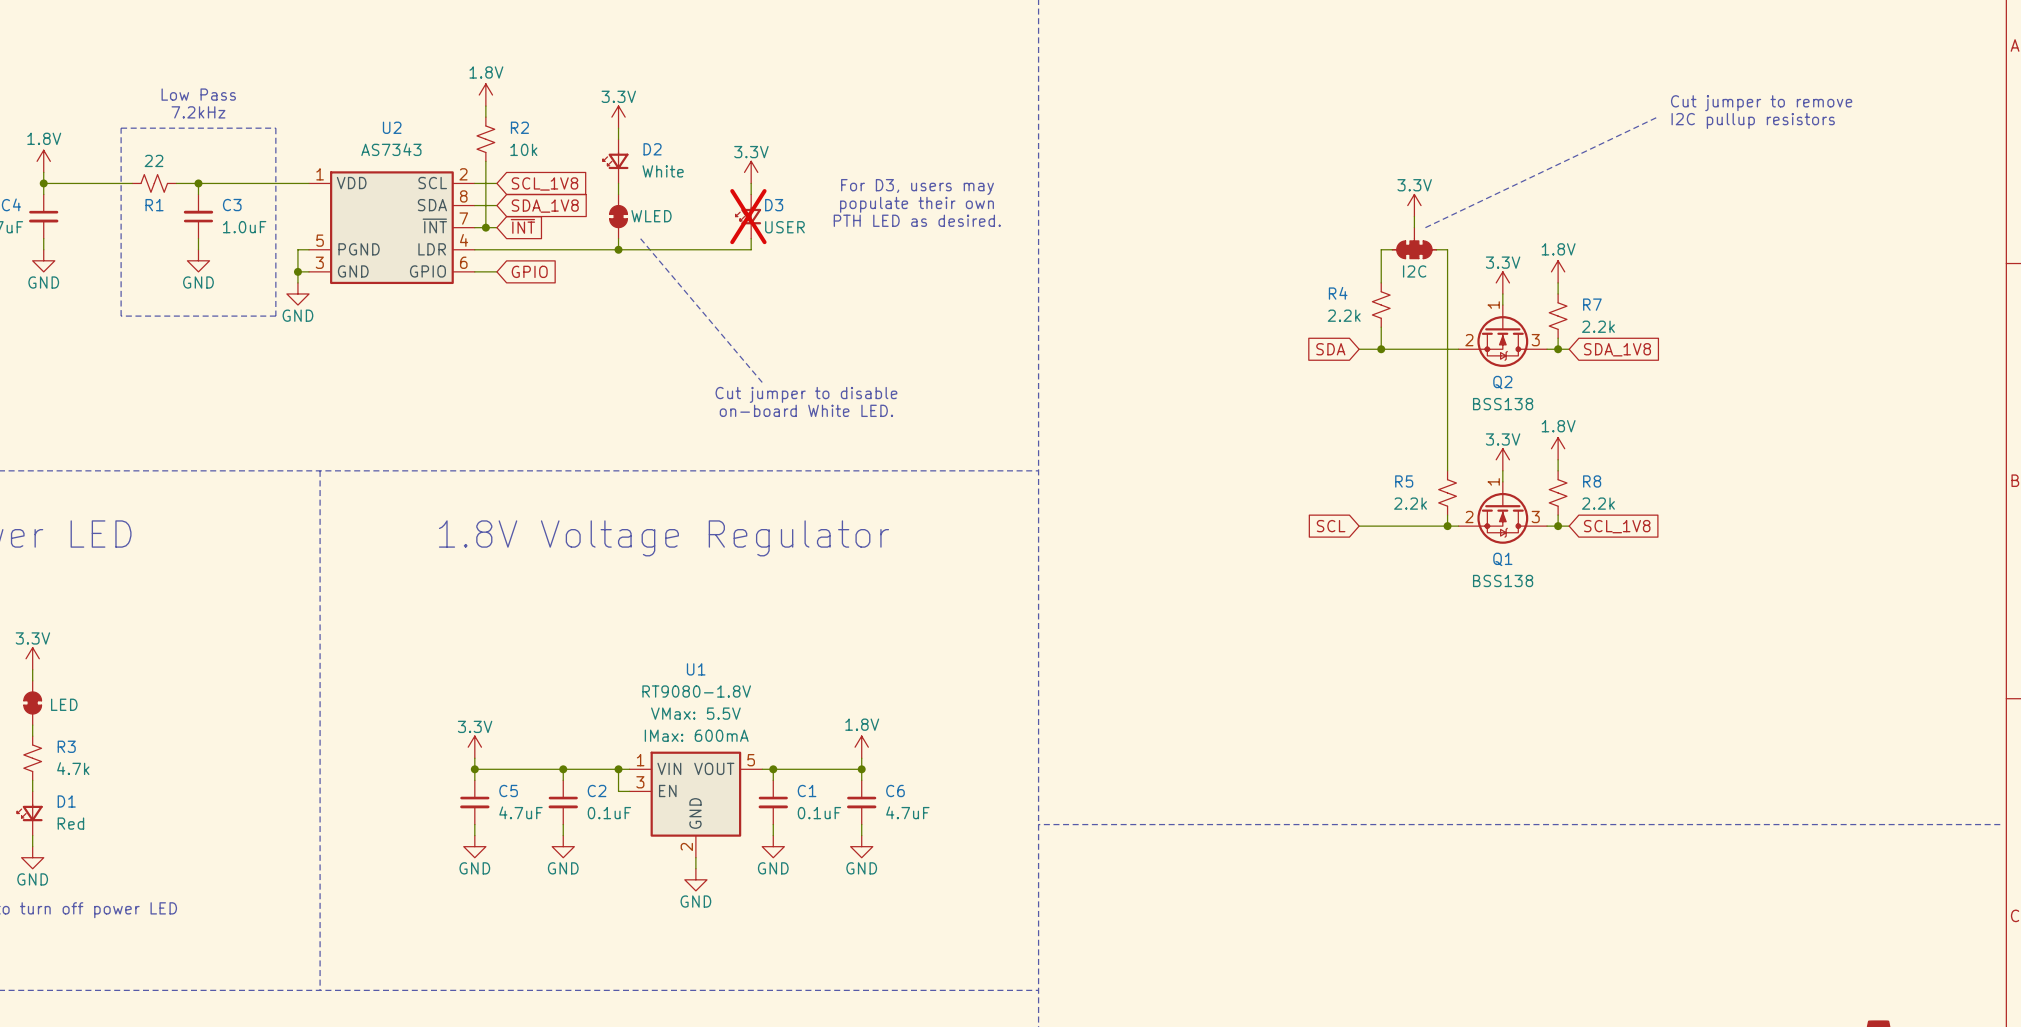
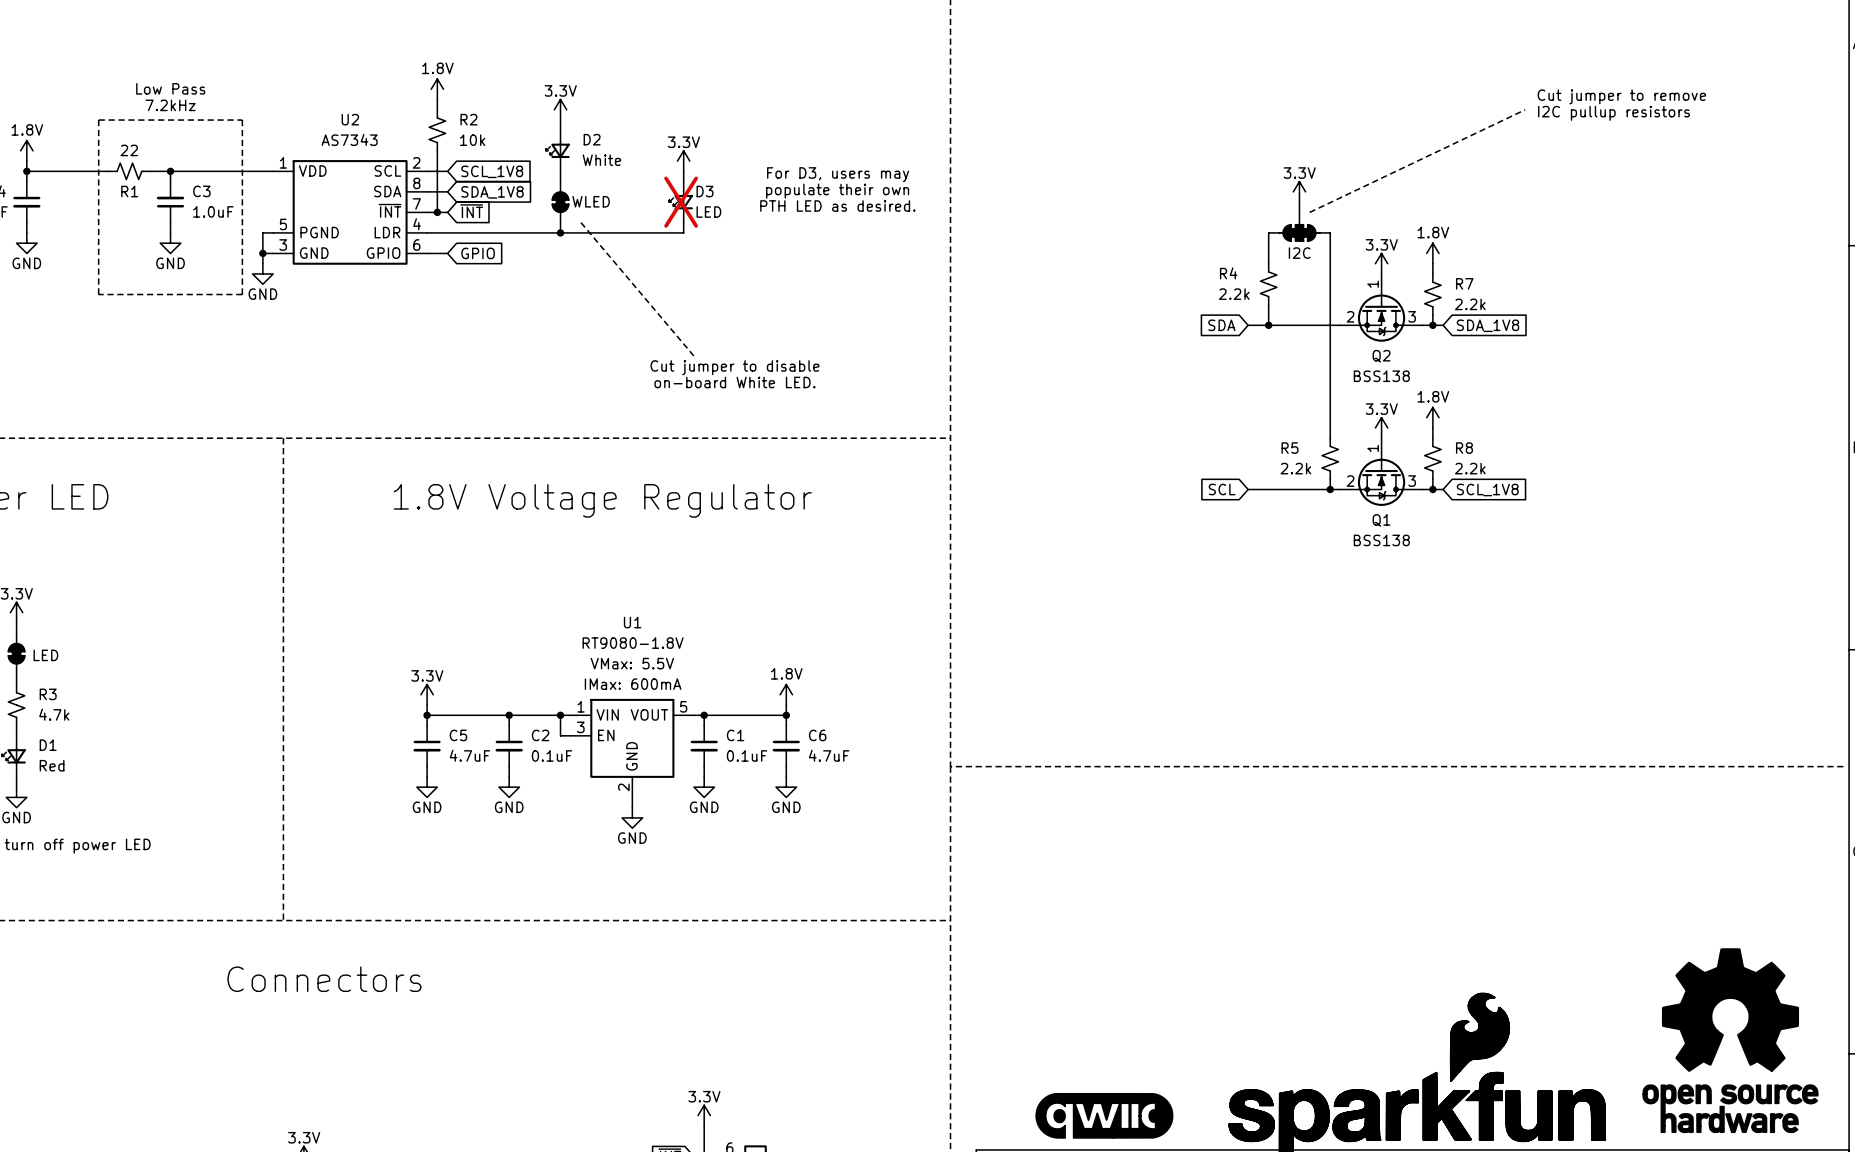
D3 value: USER (784, 227) -> LED (708, 212)

